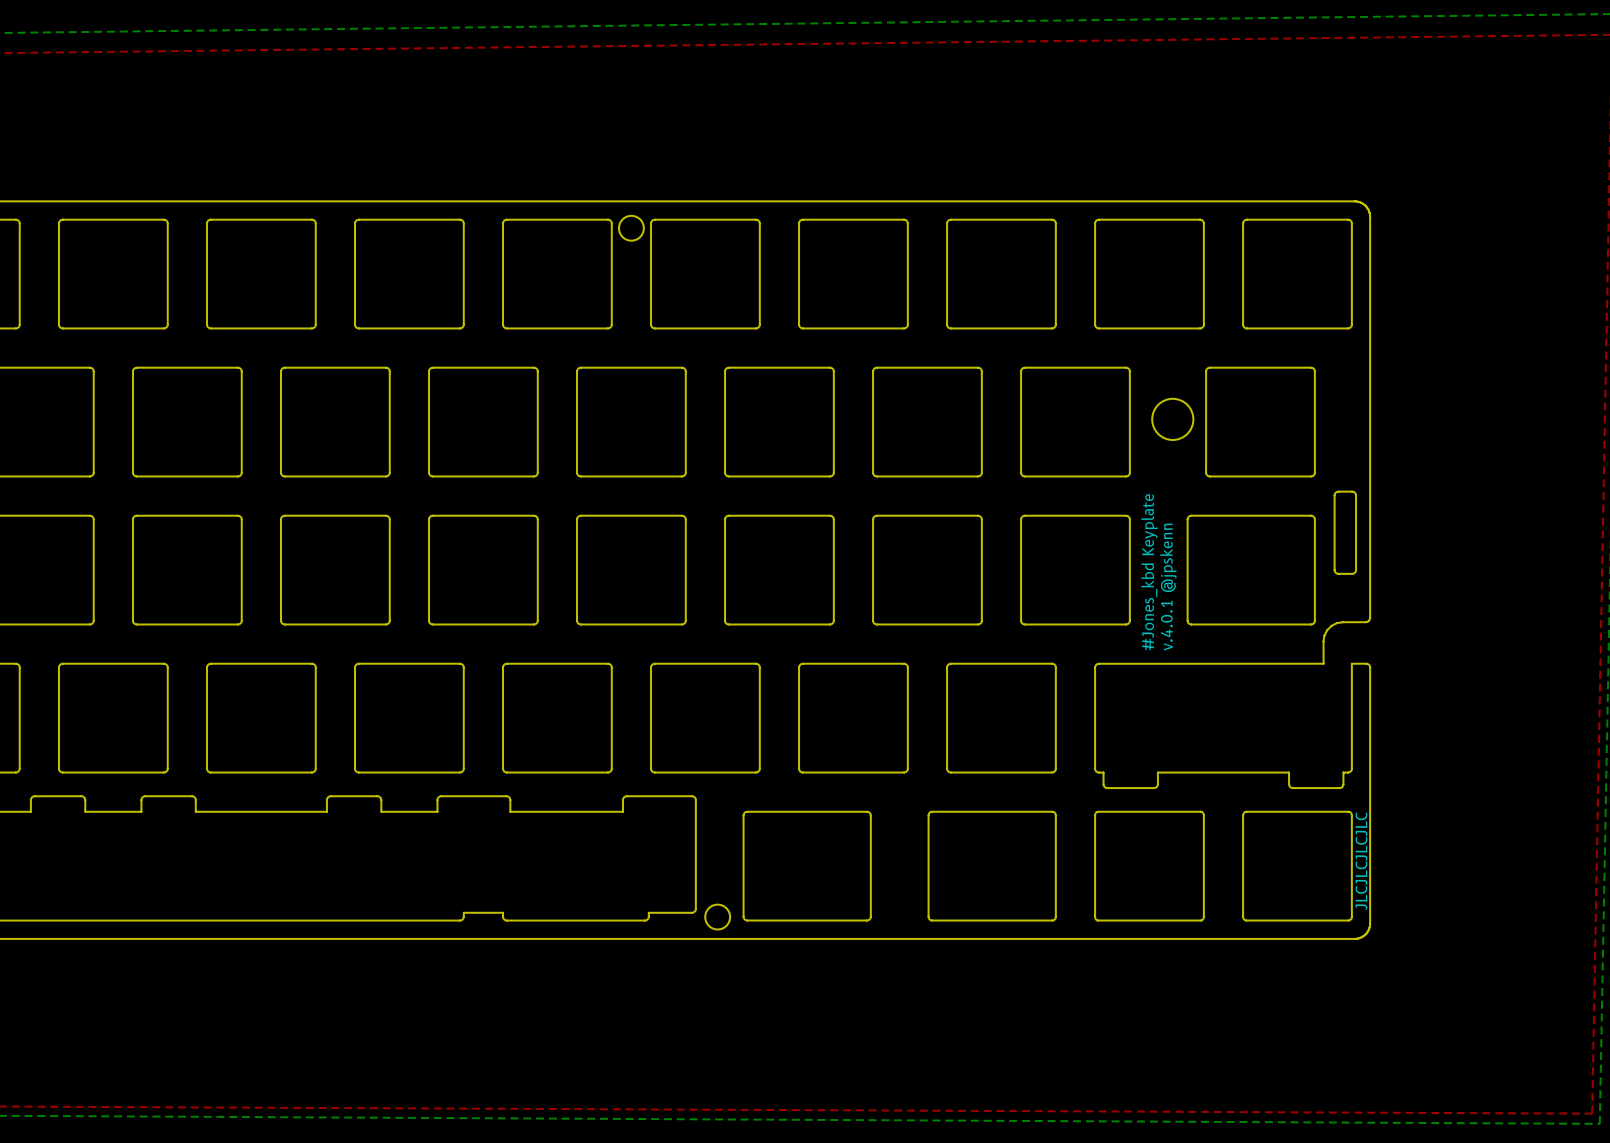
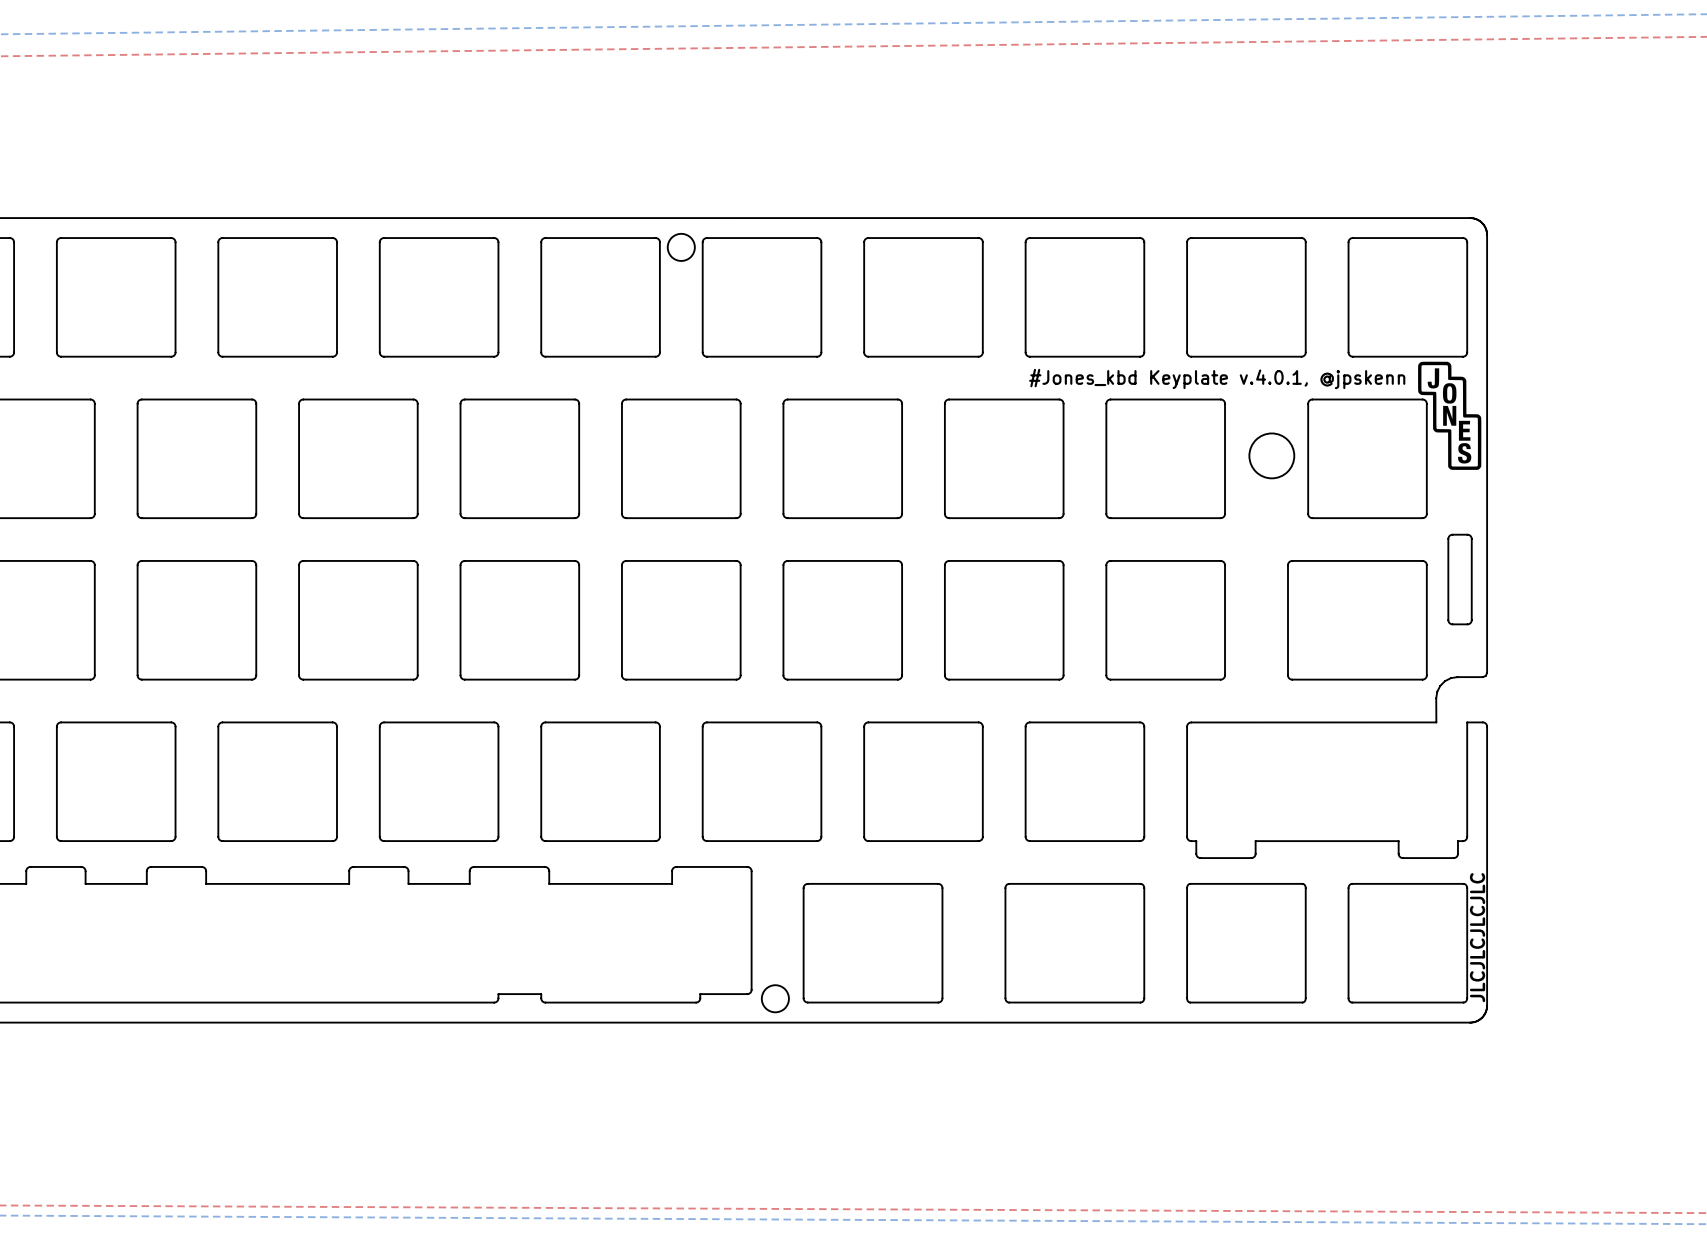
drawing: none -> [1418, 361, 1482, 470]
text: none -> #Jones_kbd Keyplate v.4.0.1, @jpskenn (1217, 378)
text: #Jones_kbd Keyplate (1149, 572) -> none
text: v.4.0.1 @jpskenn (1168, 587) -> none

